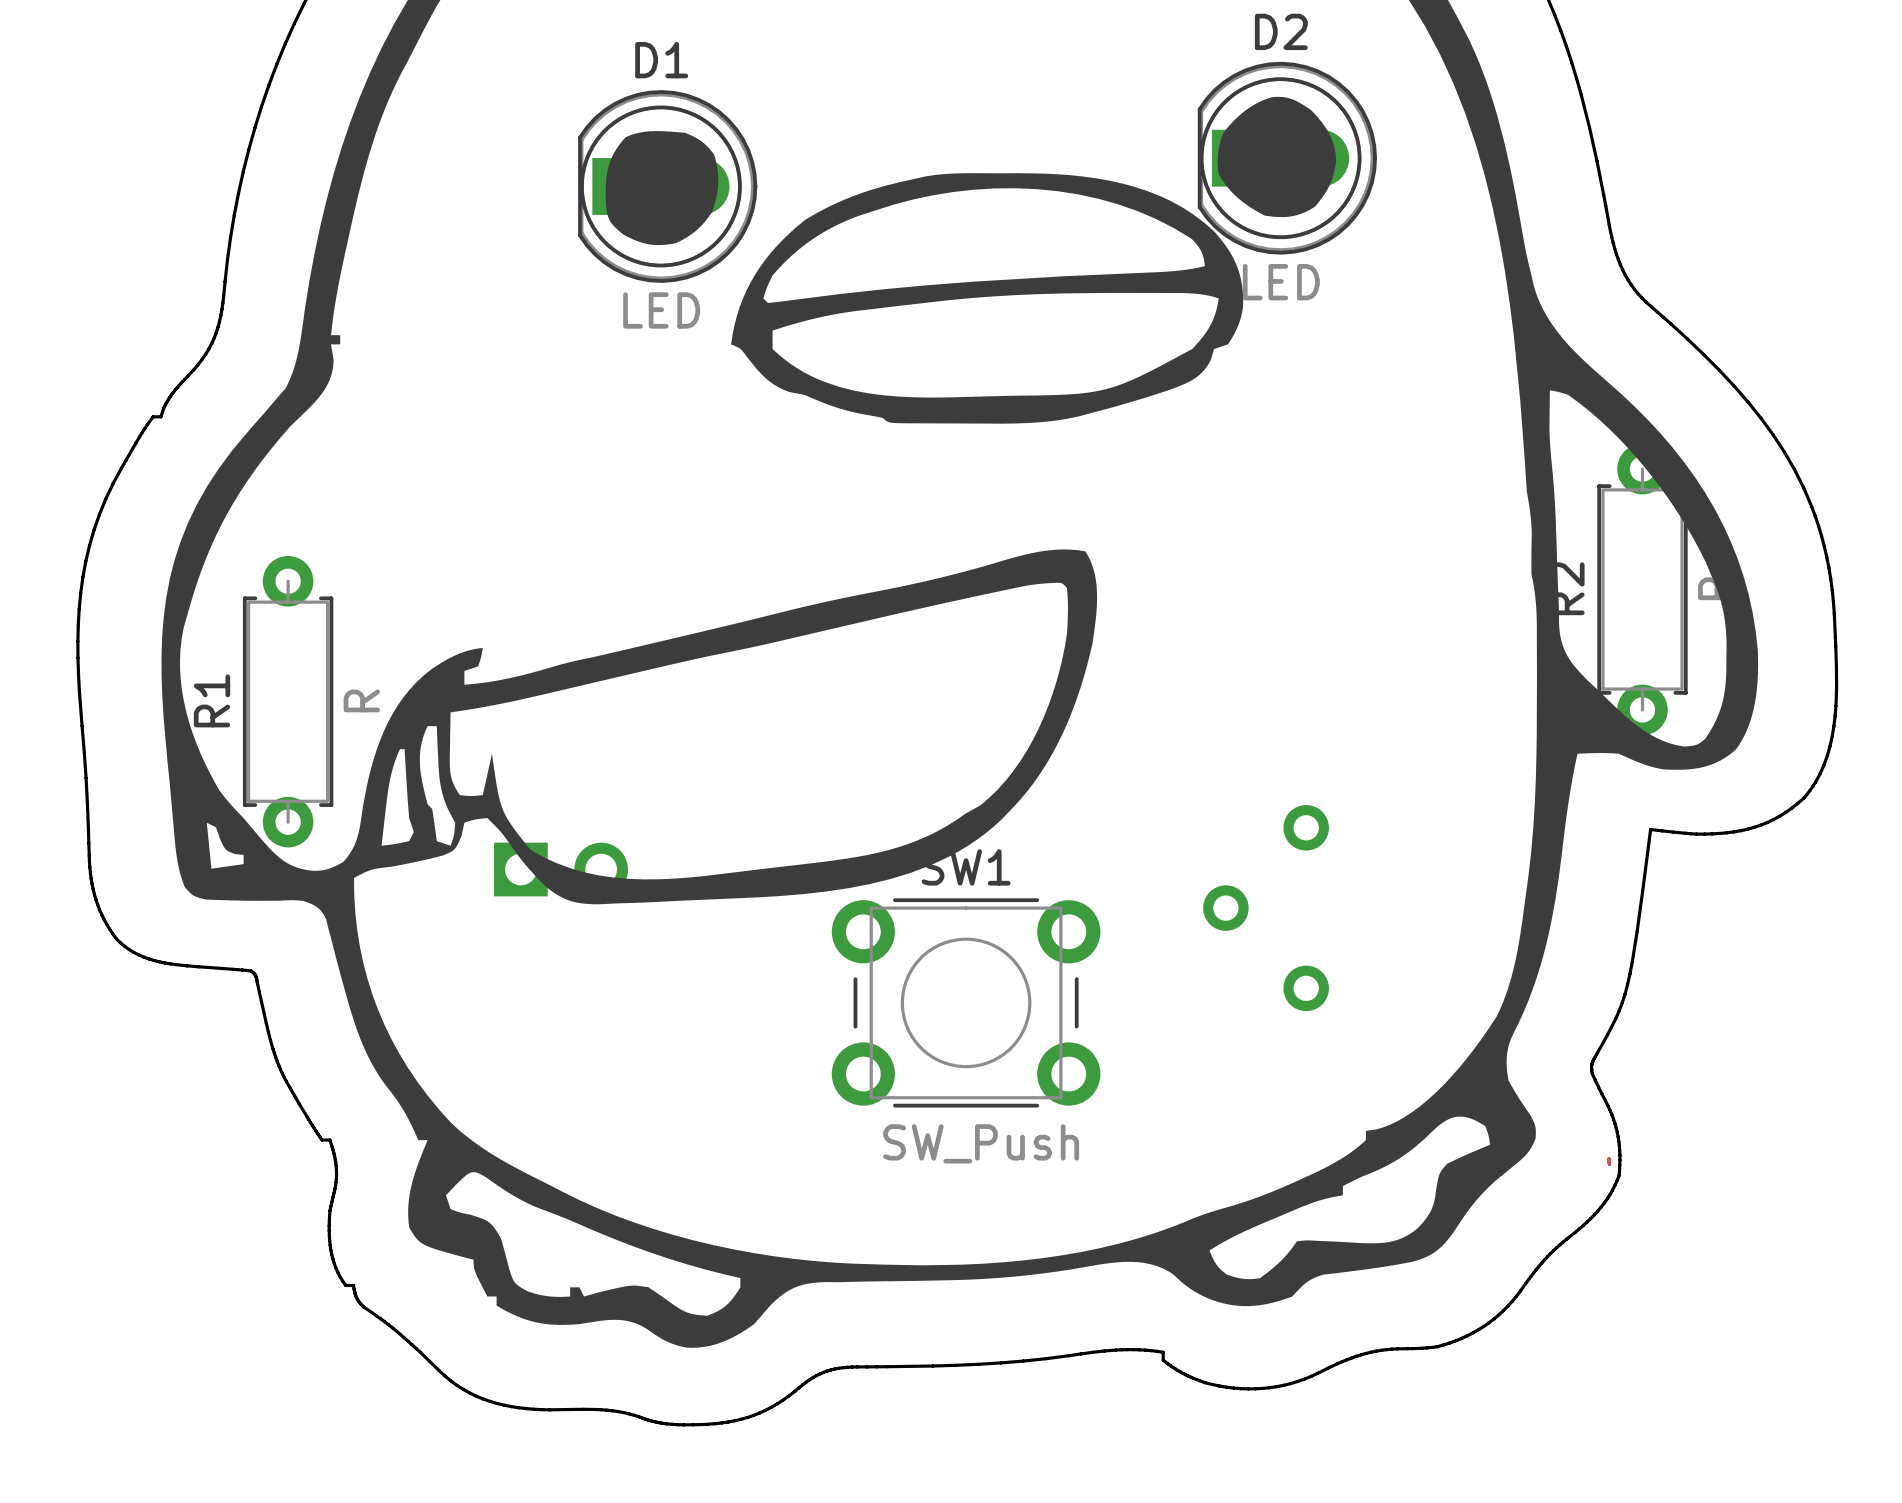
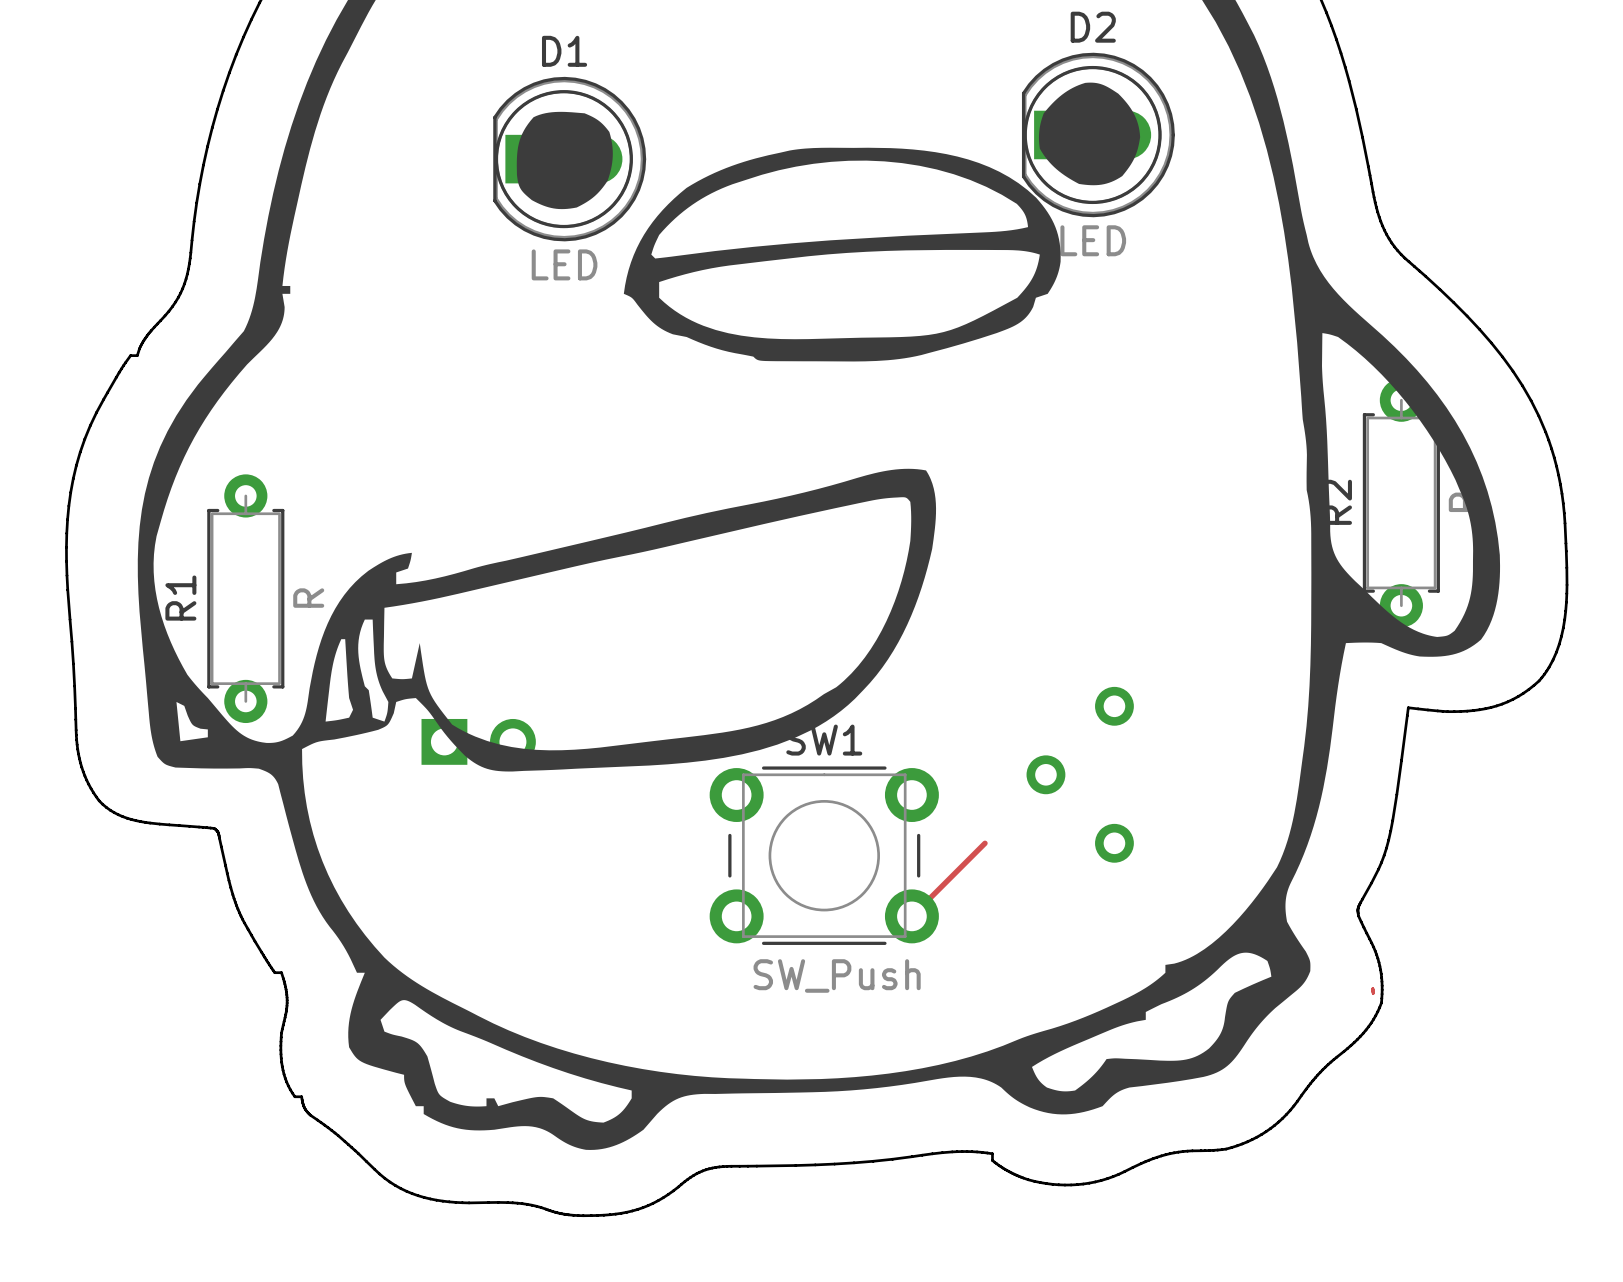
track: none -> (985, 843) (911, 916)

